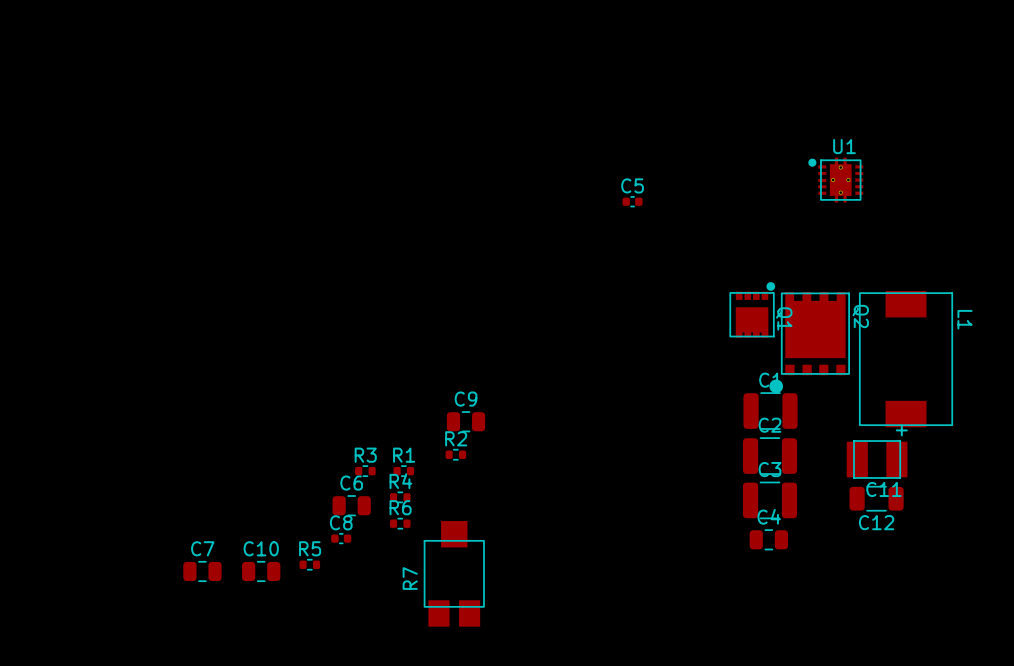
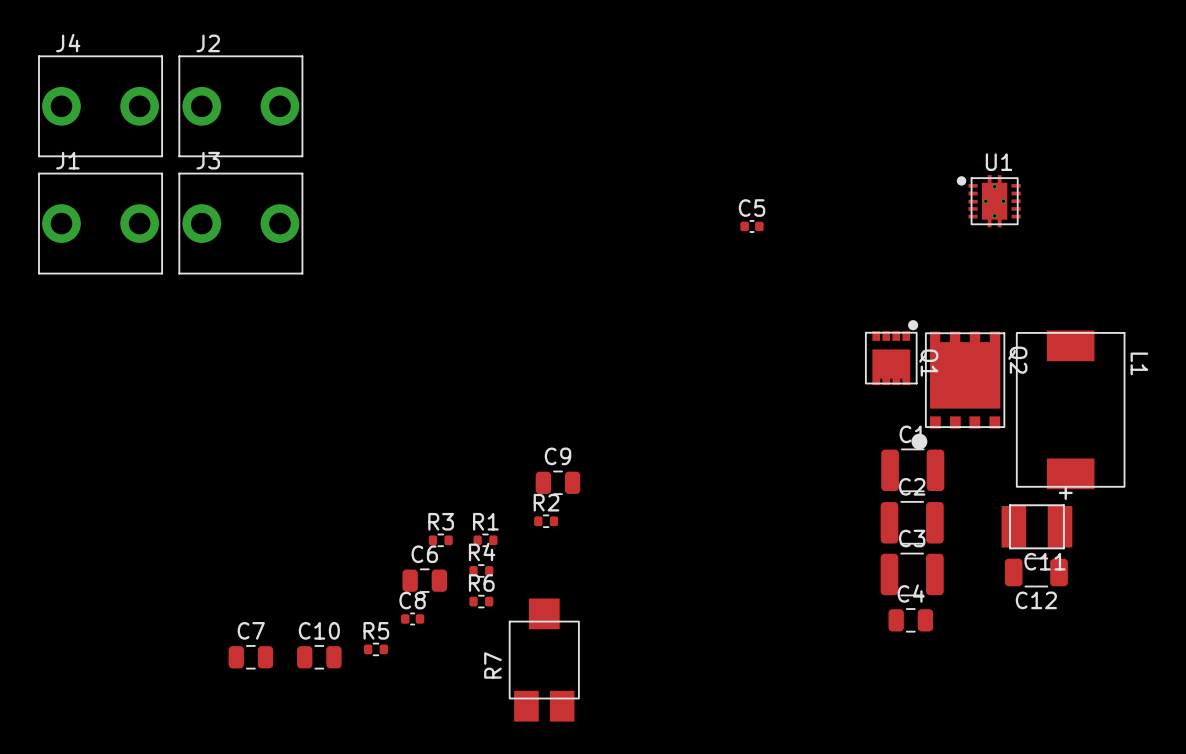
J4: none -> (100, 106)
J2: none -> (240, 106)
J1: none -> (100, 223)
J3: none -> (240, 223)

